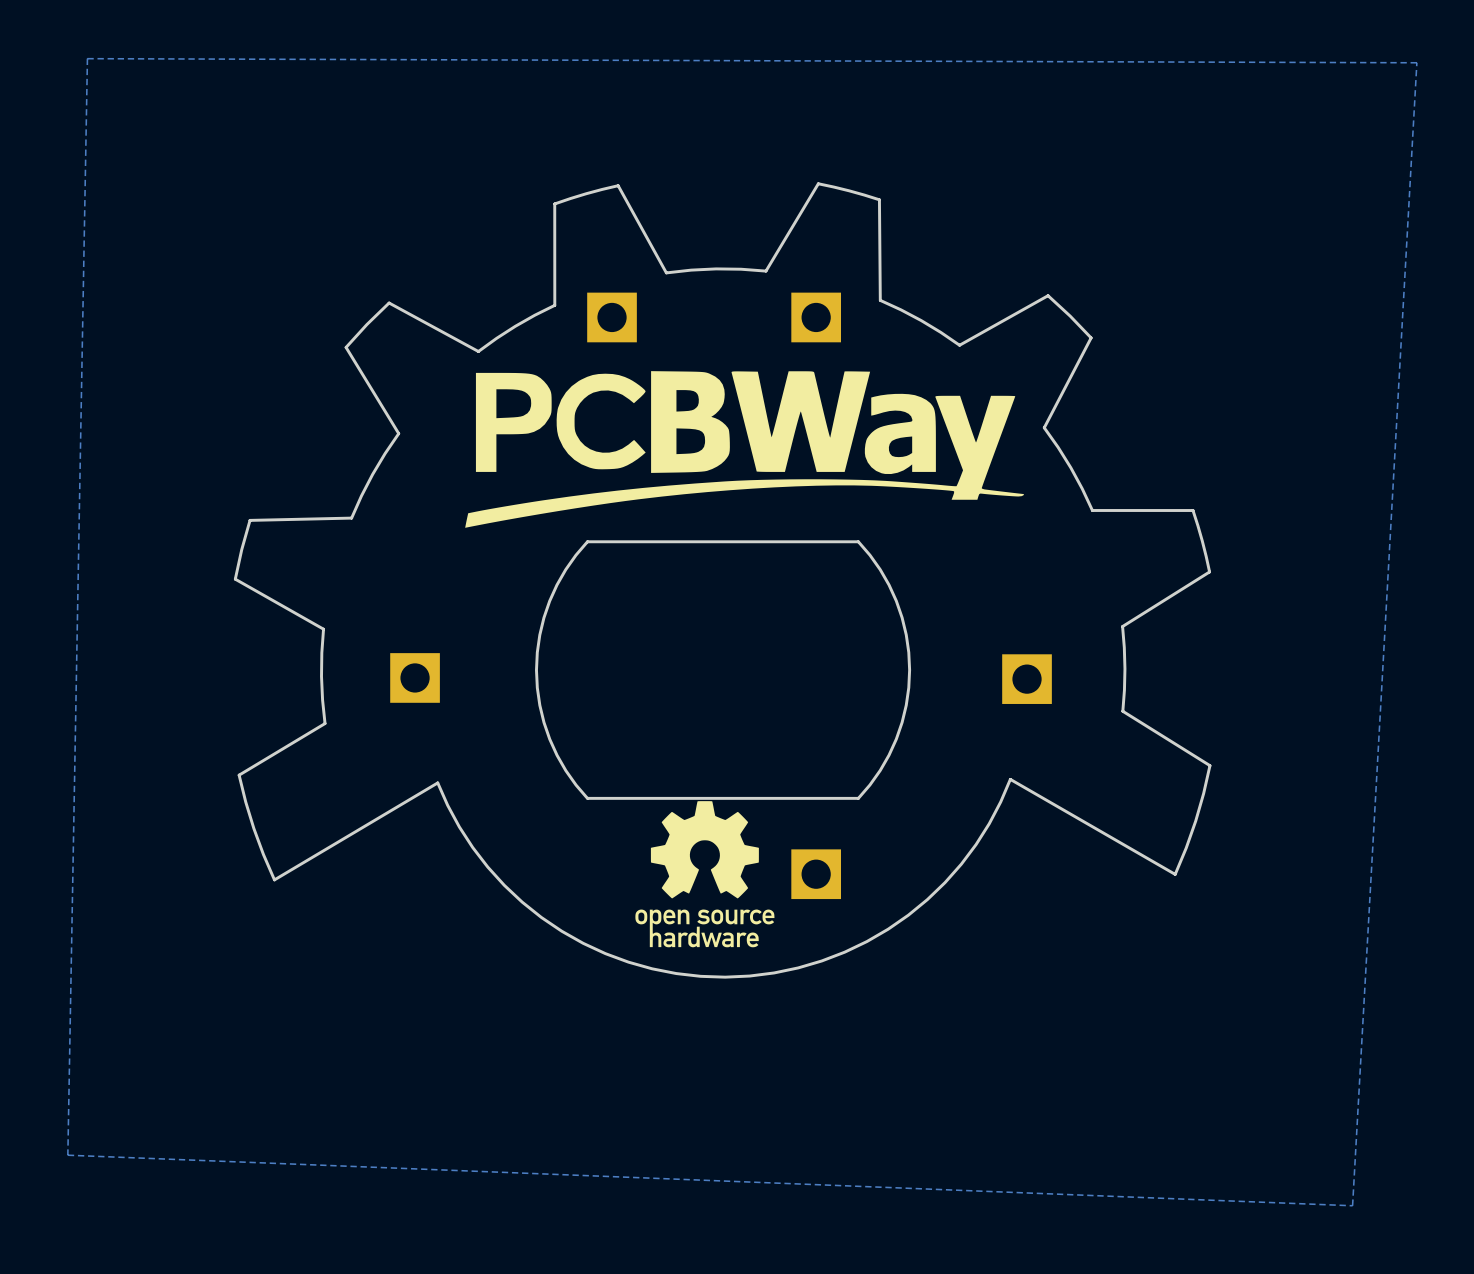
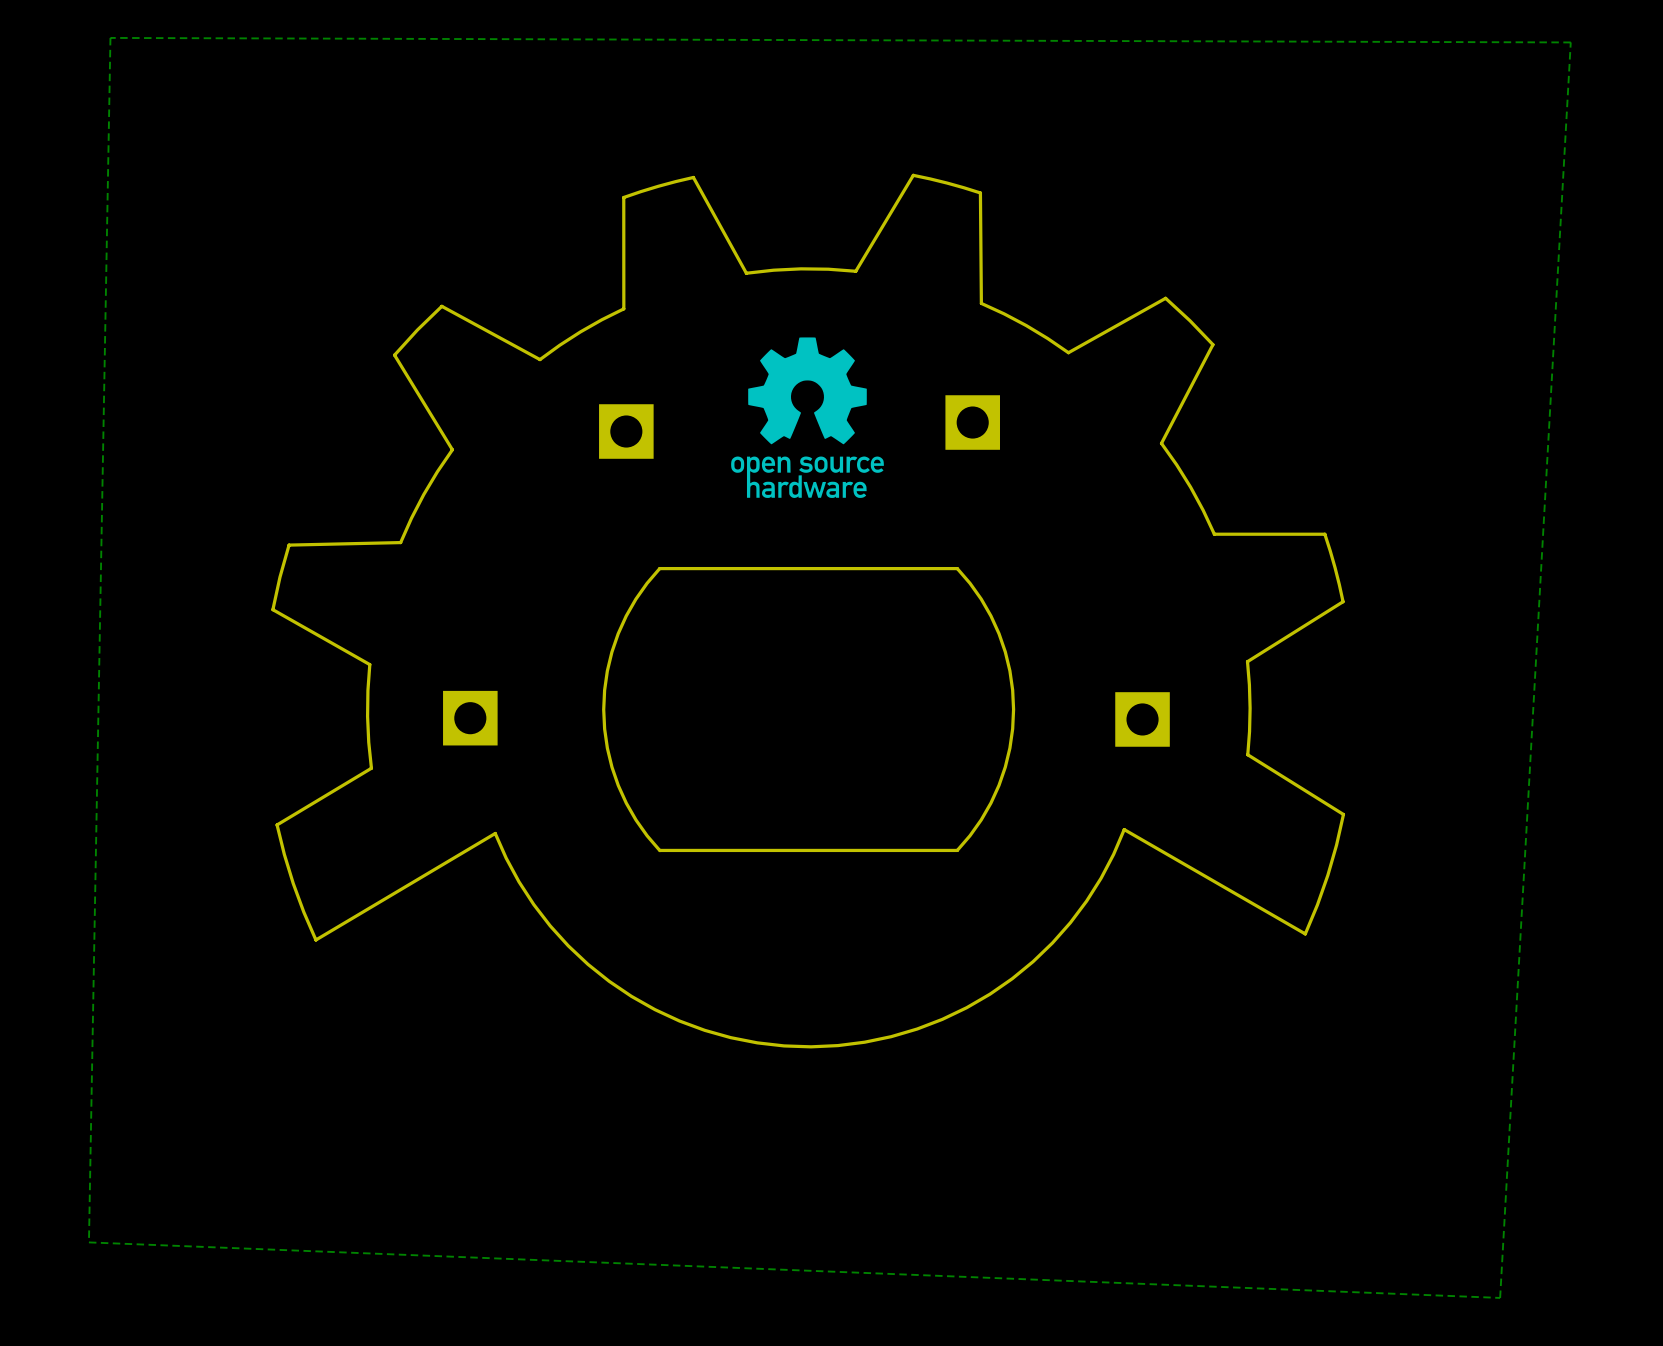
part position: (612, 317) -> (626, 431)
part position: (816, 317) -> (972, 422)
drawing: [465, 371, 1025, 528] -> none
drawing position: (704, 874) -> (807, 417)
part: (816, 874) -> none

